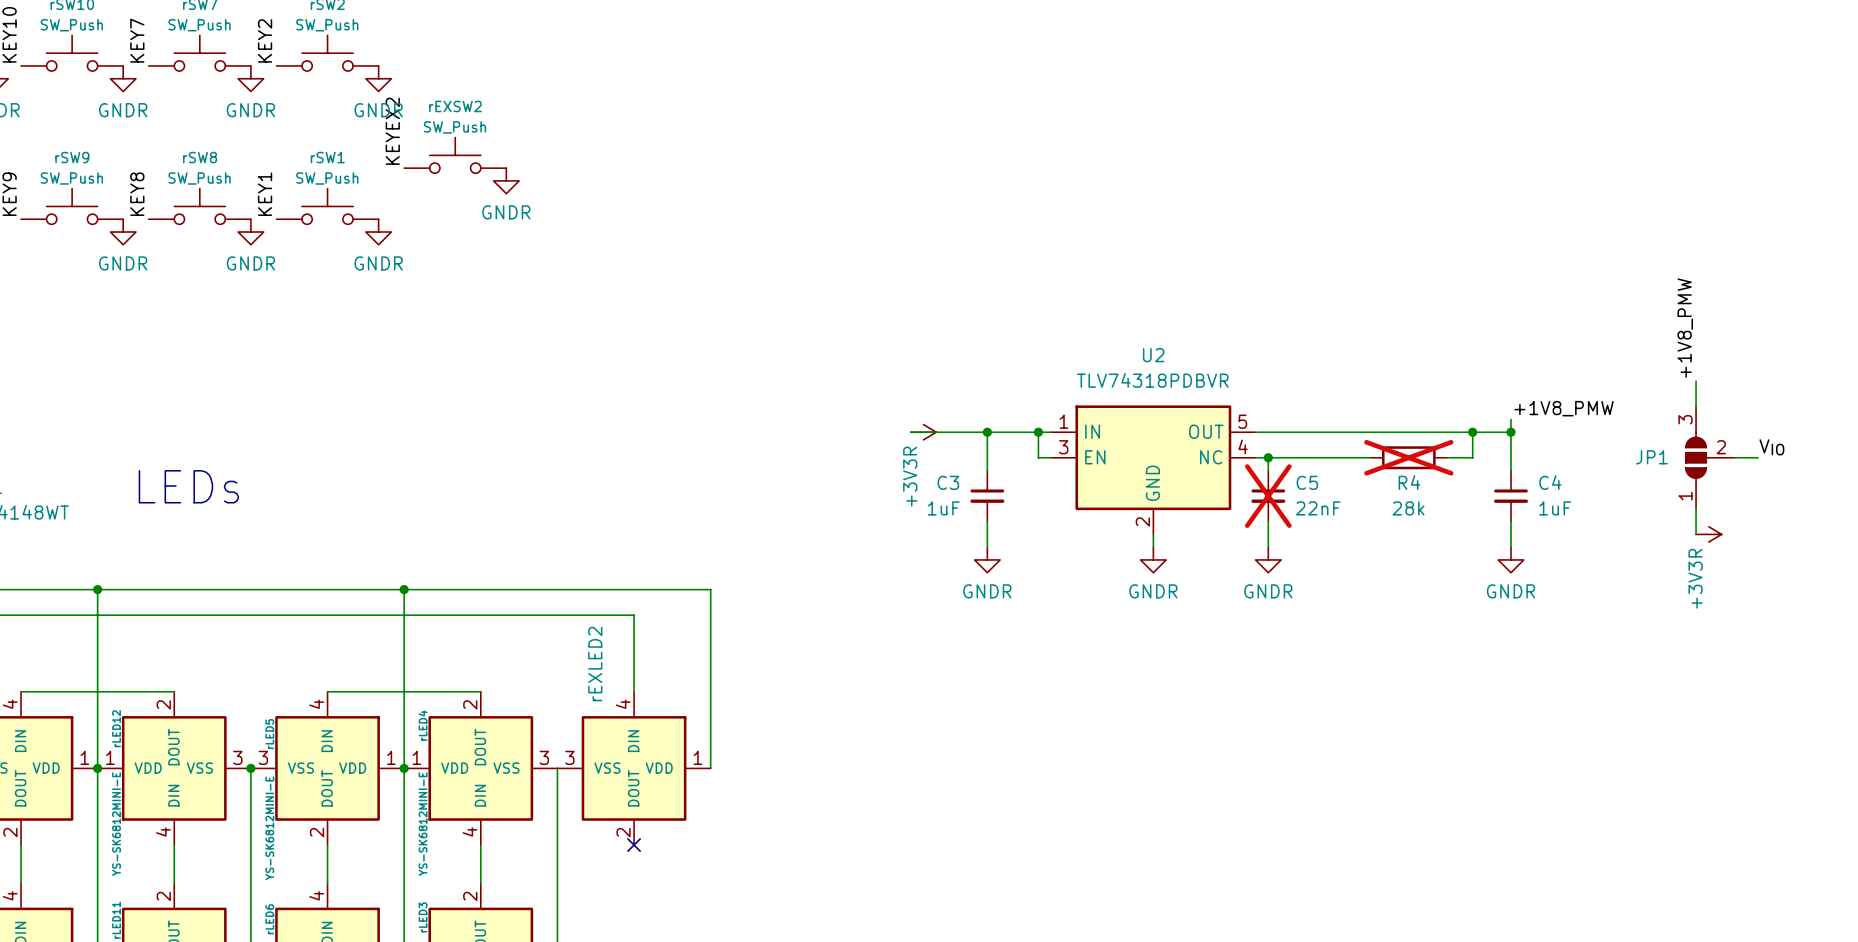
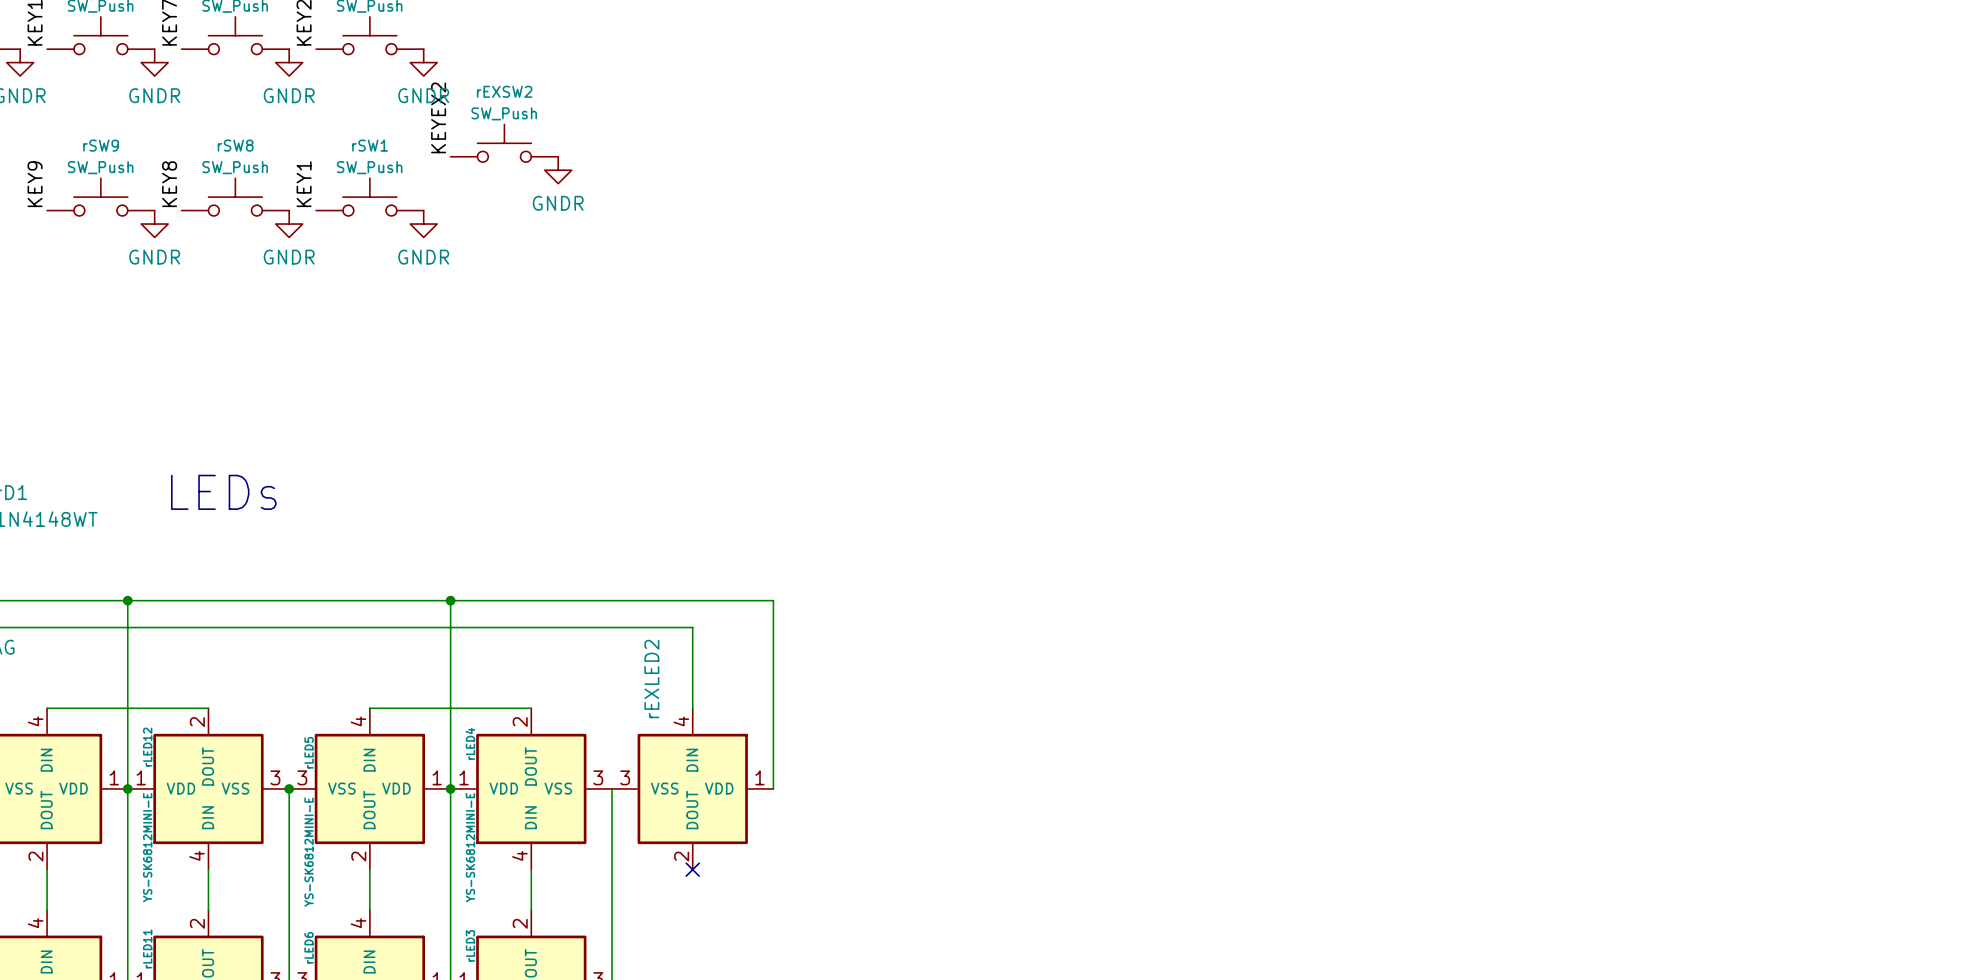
label: +1V8_PMW (1685, 328) -> none
wire: (1696, 381) (1696, 406) -> none
label: +1V8_PMW (1564, 408) -> none
wire: (1510, 419) (1510, 470) -> none
wire: (910, 432) (1051, 432) -> none
power symbol: +3V3R (923, 432) -> none
wire: (987, 432) (987, 470) -> none
junction: (987, 432) -> none
wire: (1038, 432) (1038, 457) (1051, 457) -> none
junction: (1038, 432) -> none
wire: (1255, 432) (1510, 432) -> none
wire: (1472, 432) (1472, 457) (1447, 457) -> none
junction: (1472, 432) -> none
junction: (1510, 432) -> none
label: VIO (1771, 447) -> none
wire: (1255, 457) (1370, 457) -> none
wire: (1268, 457) (1268, 470) -> none
junction: (1268, 457) -> none
R4: 28k (1408, 457) -> none
JP1: (1710, 457) -> none
wire: (1734, 457) (1757, 457) -> none
U2: TLV74318PDBVR (1153, 469) -> none
C3: 1uF (987, 496) -> none
C5: 22nF (1268, 496) -> none
C4: 1uF (1510, 496) -> none
wire: (1696, 508) (1696, 534) -> none
wire: (987, 521) (987, 547) -> none
wire: (1268, 521) (1268, 547) -> none
wire: (1510, 521) (1510, 547) -> none
wire: (1153, 534) (1153, 547) -> none
power symbol: +3V3R (1708, 534) -> none
power symbol: GNDR (987, 559) -> none
power symbol: GNDR (1153, 559) -> none
power symbol: GNDR (1268, 559) -> none
power symbol: GNDR (1510, 559) -> none

